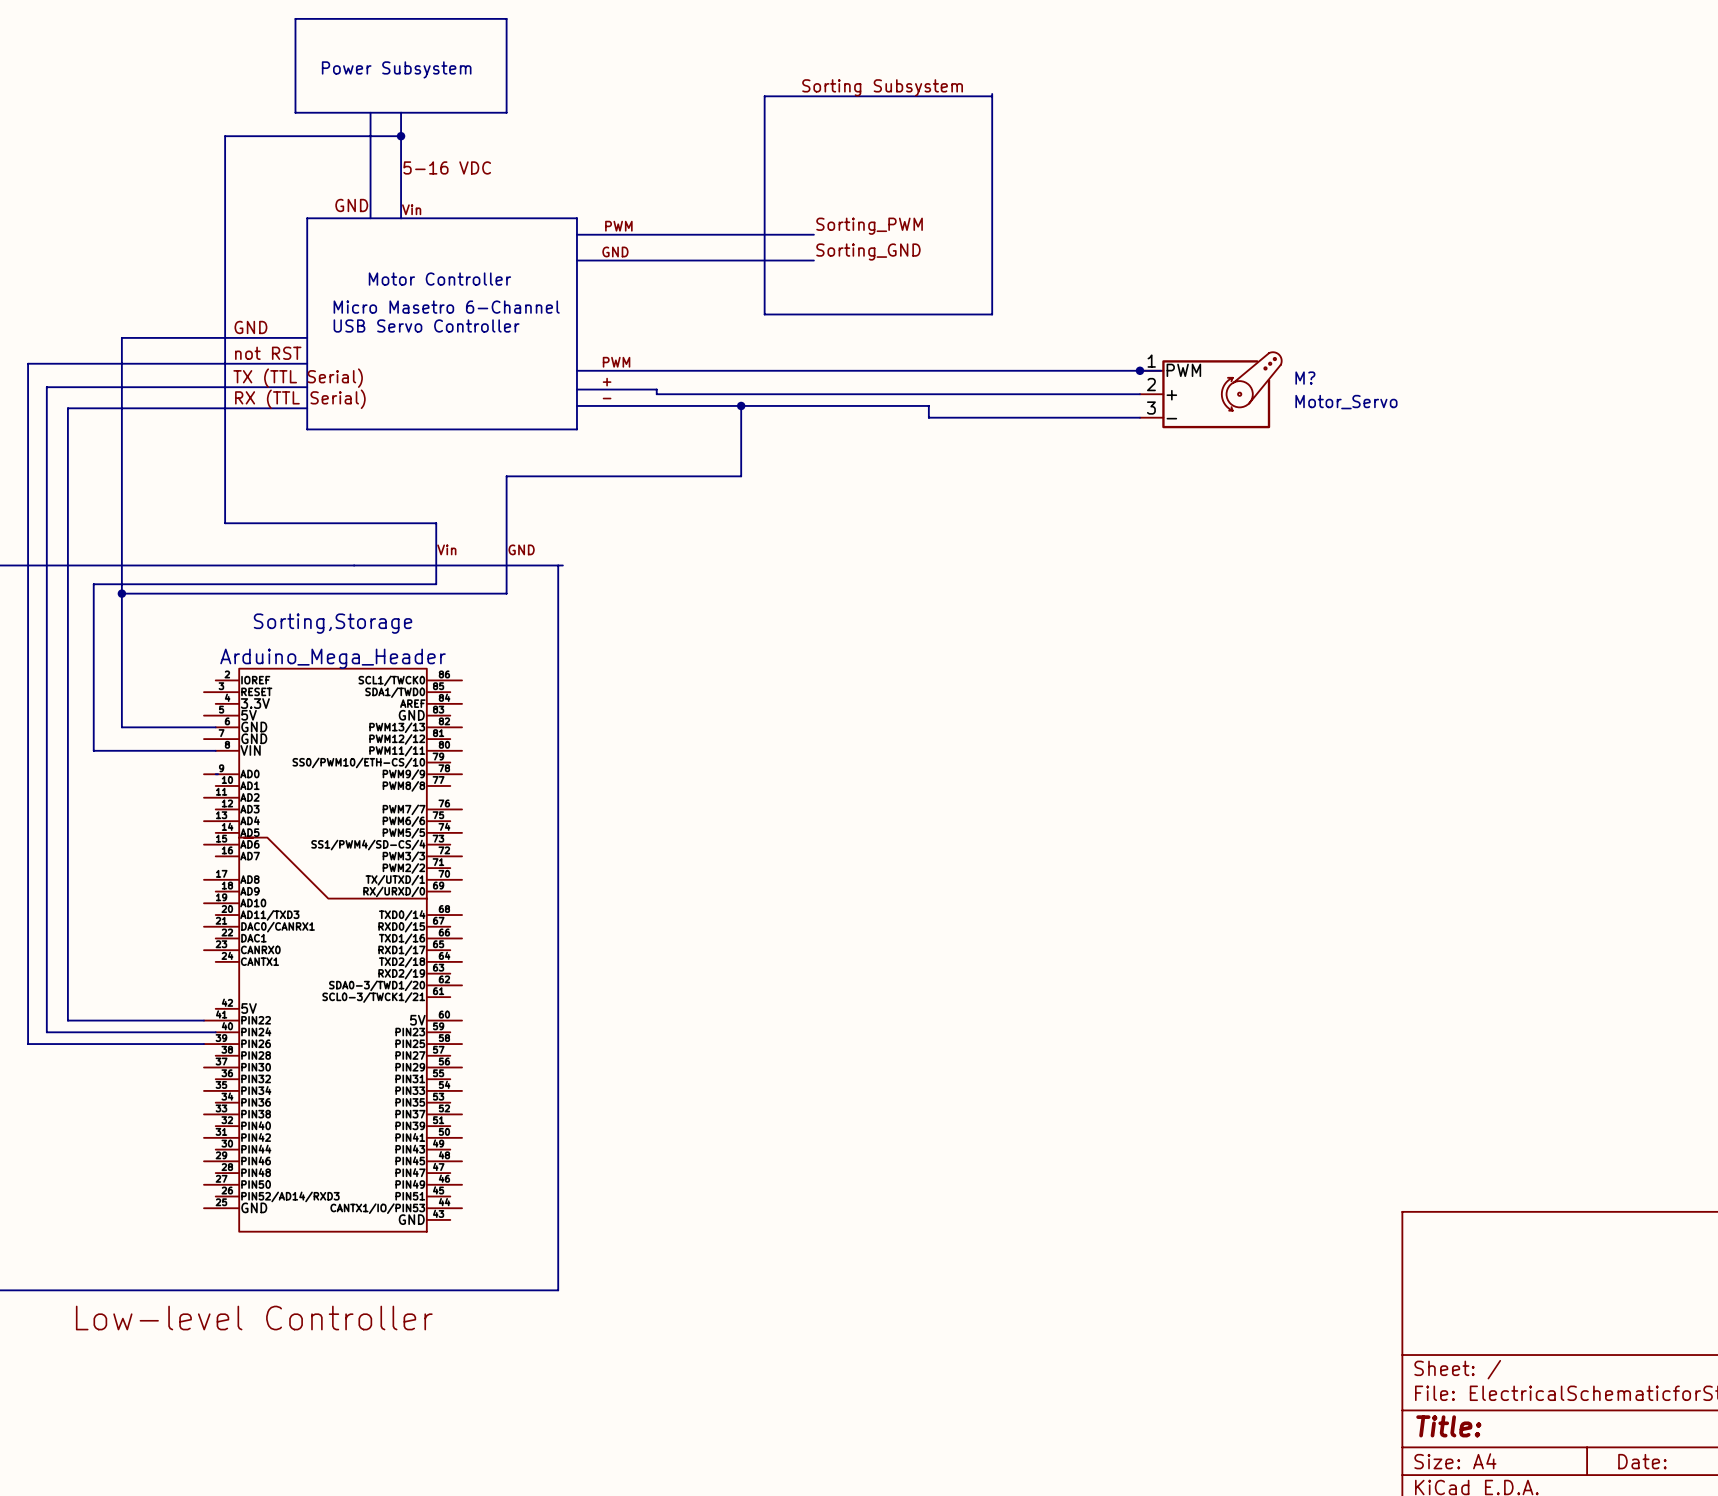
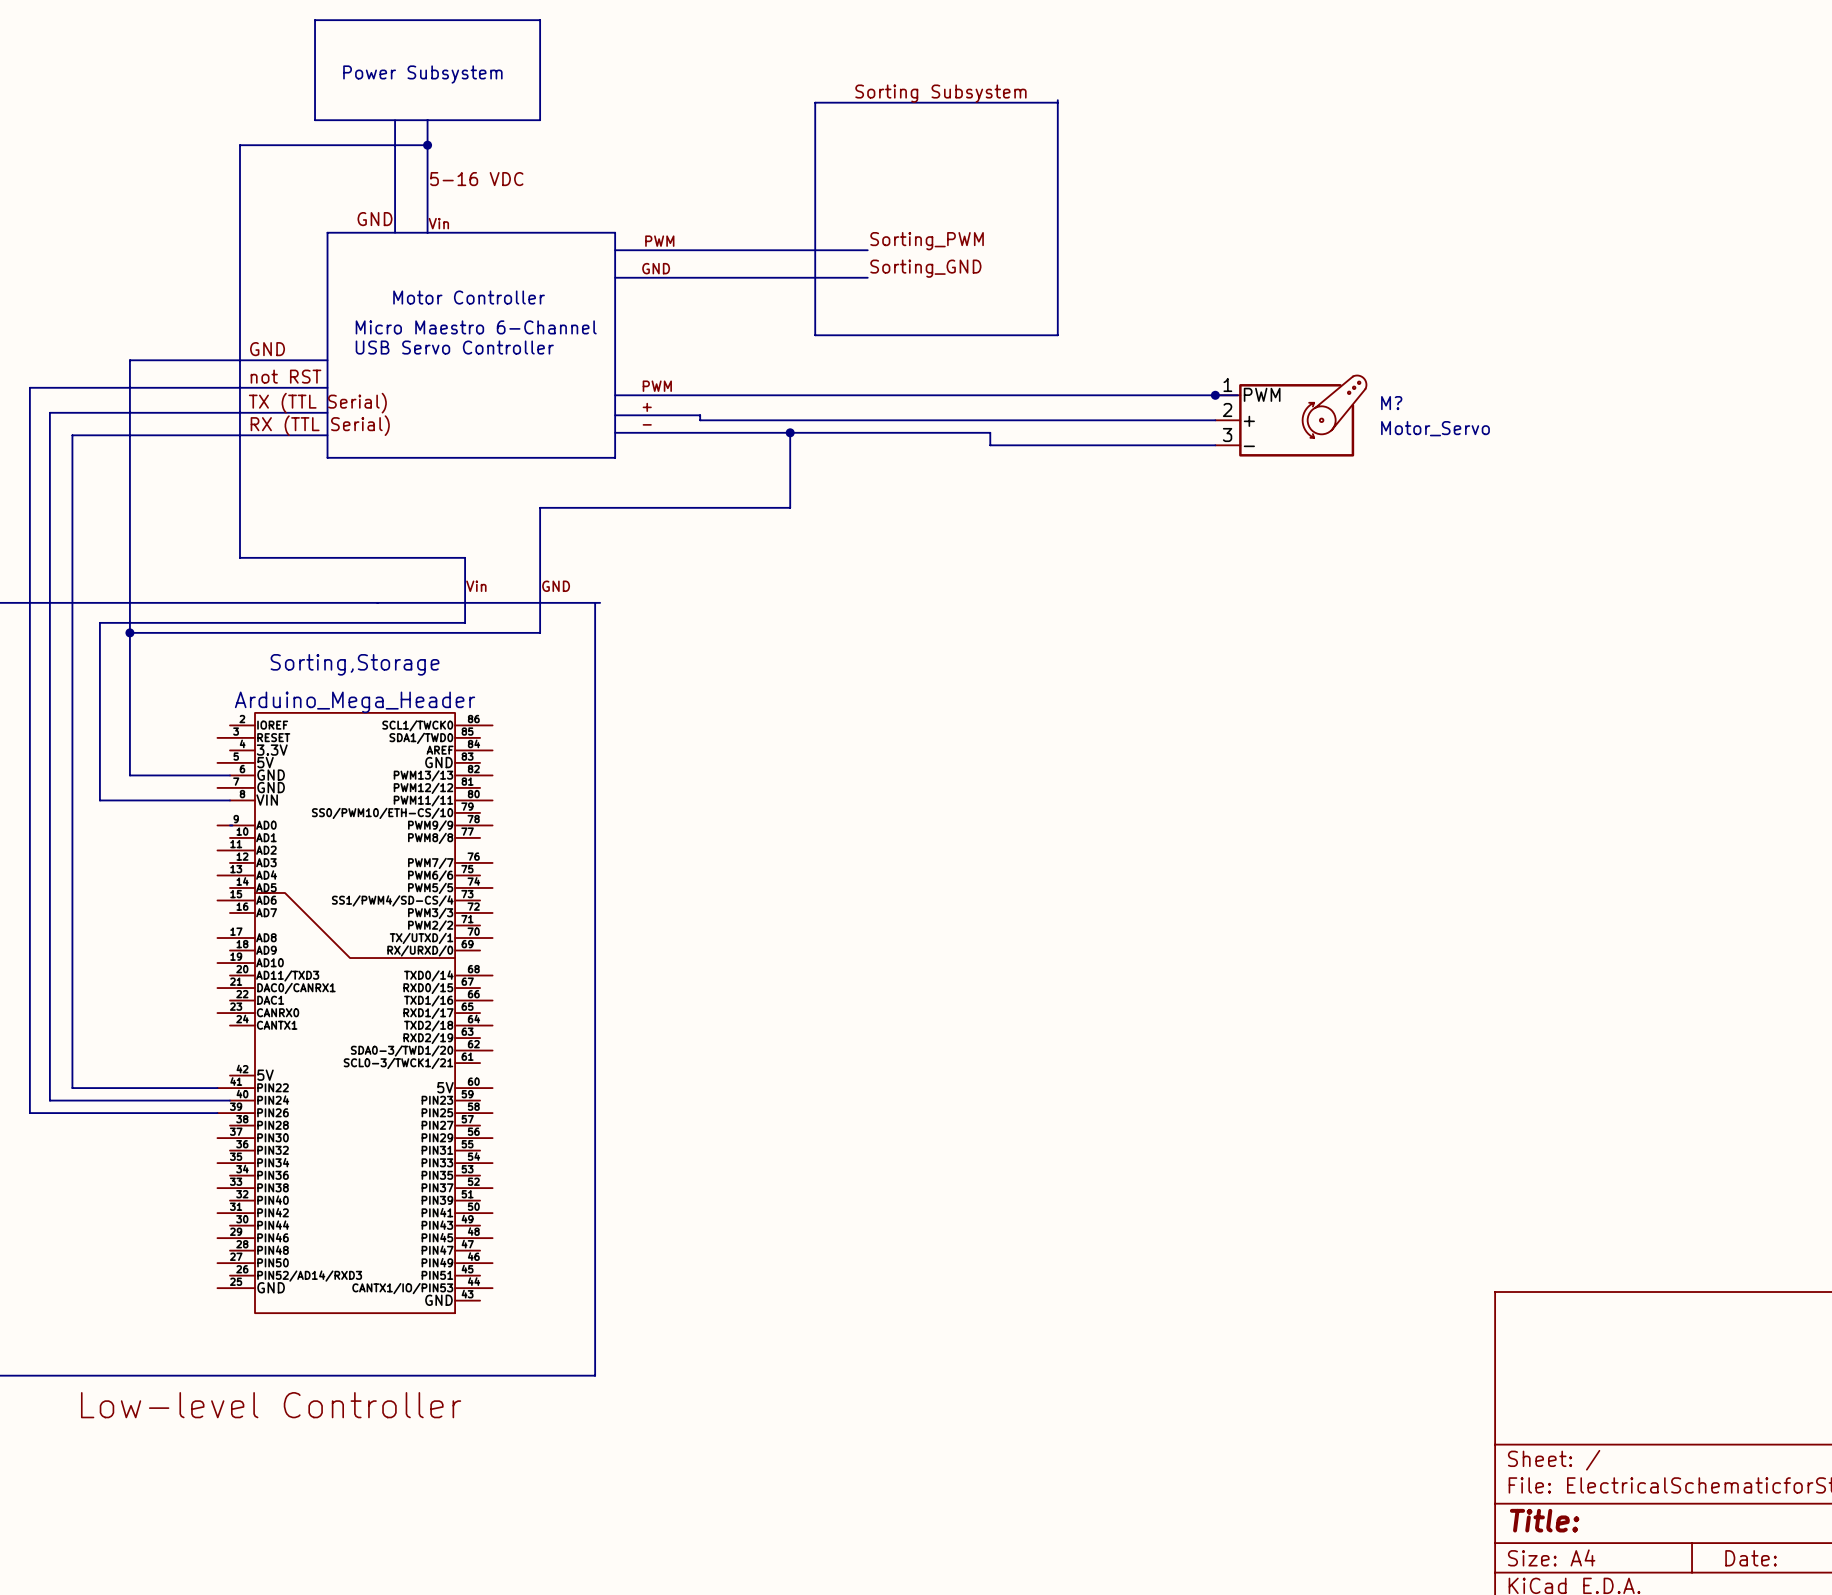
text: Micro Masetro 6-Channel (446, 307) -> Micro Maestro 6-Channel (476, 327)

